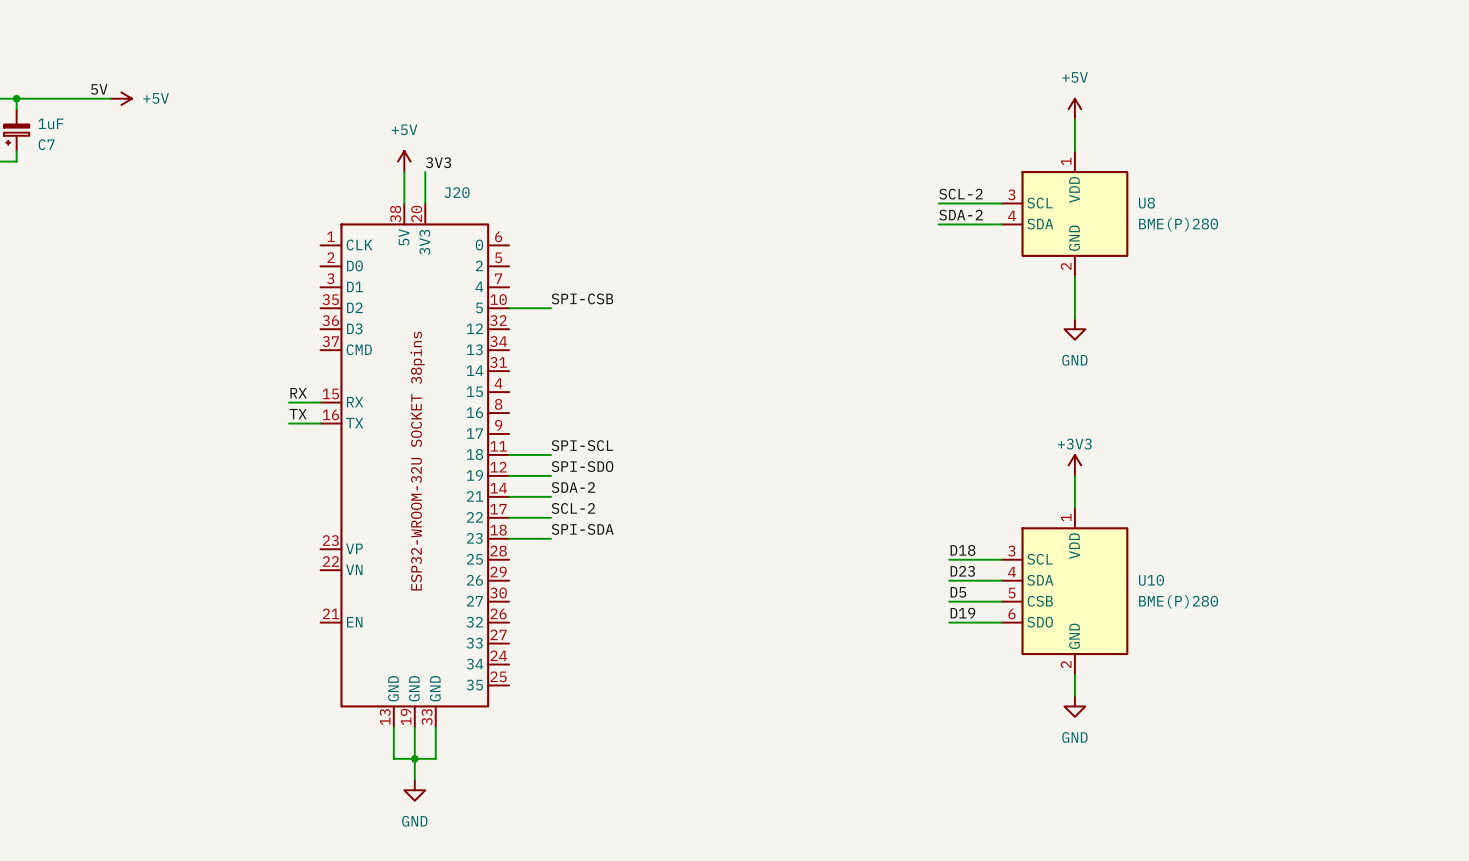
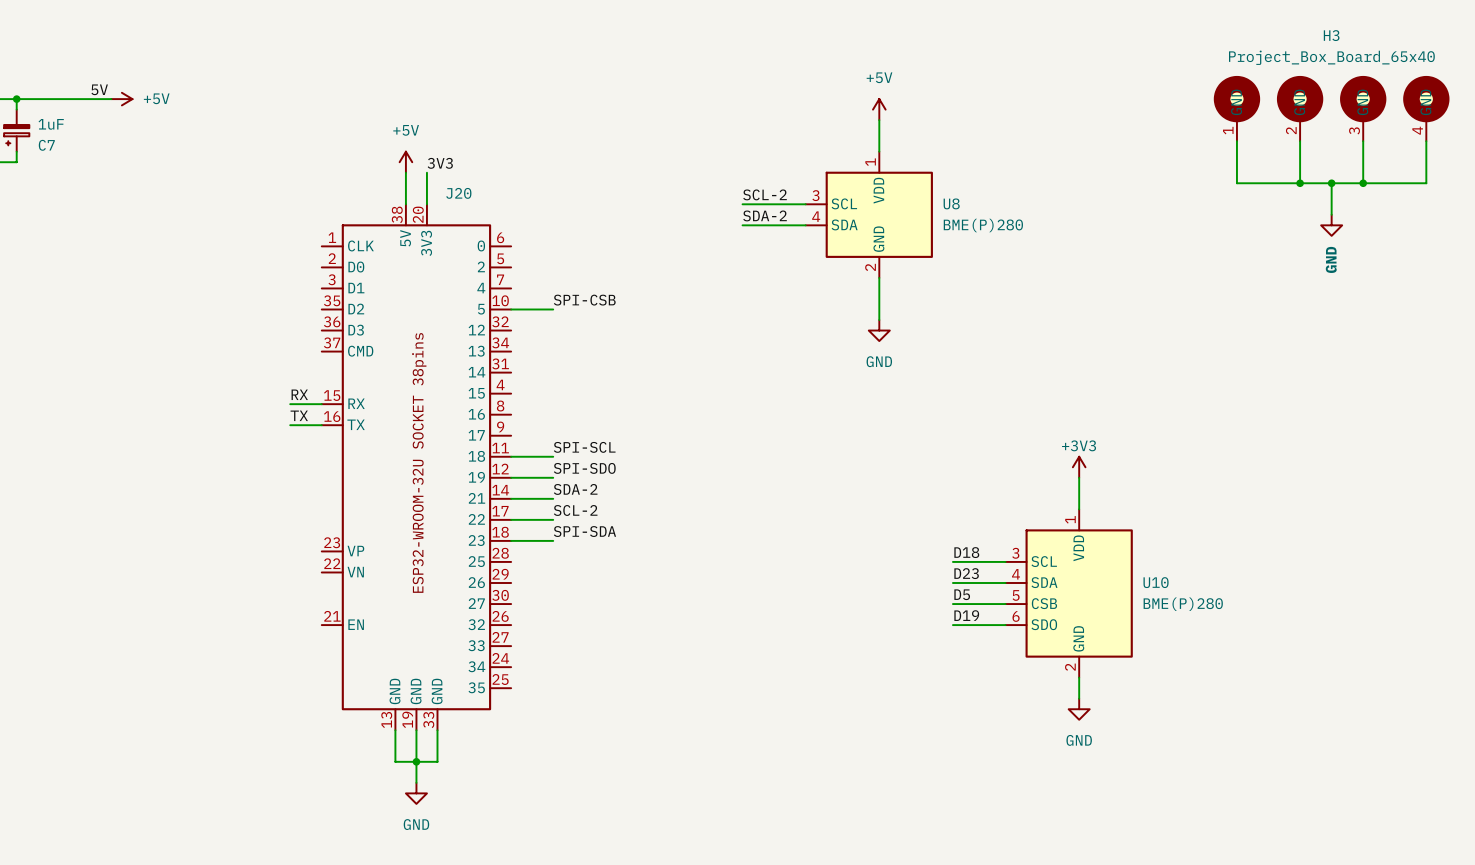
H3: none -> Project_Box_Board_65x40 (1331, 108)
power symbol position: +5V (1074, 109) -> +5V (879, 109)
wire: (1074, 119) (1074, 151) -> (879, 120) (879, 151)
wire: none -> (1236, 141) (1236, 183) (1426, 183) (1426, 141)
wire: none -> (1300, 141) (1300, 183)
wire: none -> (1363, 141) (1363, 183)
junction: none -> (1300, 183)
wire: none -> (1331, 183) (1331, 214)
junction: none -> (1331, 183)
junction: none -> (1363, 183)
label position: SCL-2 (961, 194) -> SCL-2 (765, 194)
wire: (938, 203) (1001, 203) -> (742, 204) (805, 204)
U8 position: (1064, 213) -> (869, 214)
label position: SDA-2 (961, 215) -> SDA-2 (765, 215)
wire: (938, 224) (1001, 224) -> (742, 225) (805, 225)
power symbol: none -> GND (1331, 225)
wire: (1074, 276) (1074, 318) -> (879, 277) (879, 320)
power symbol: none -> GND (879, 330)
power symbol: GND (1074, 329) -> none

